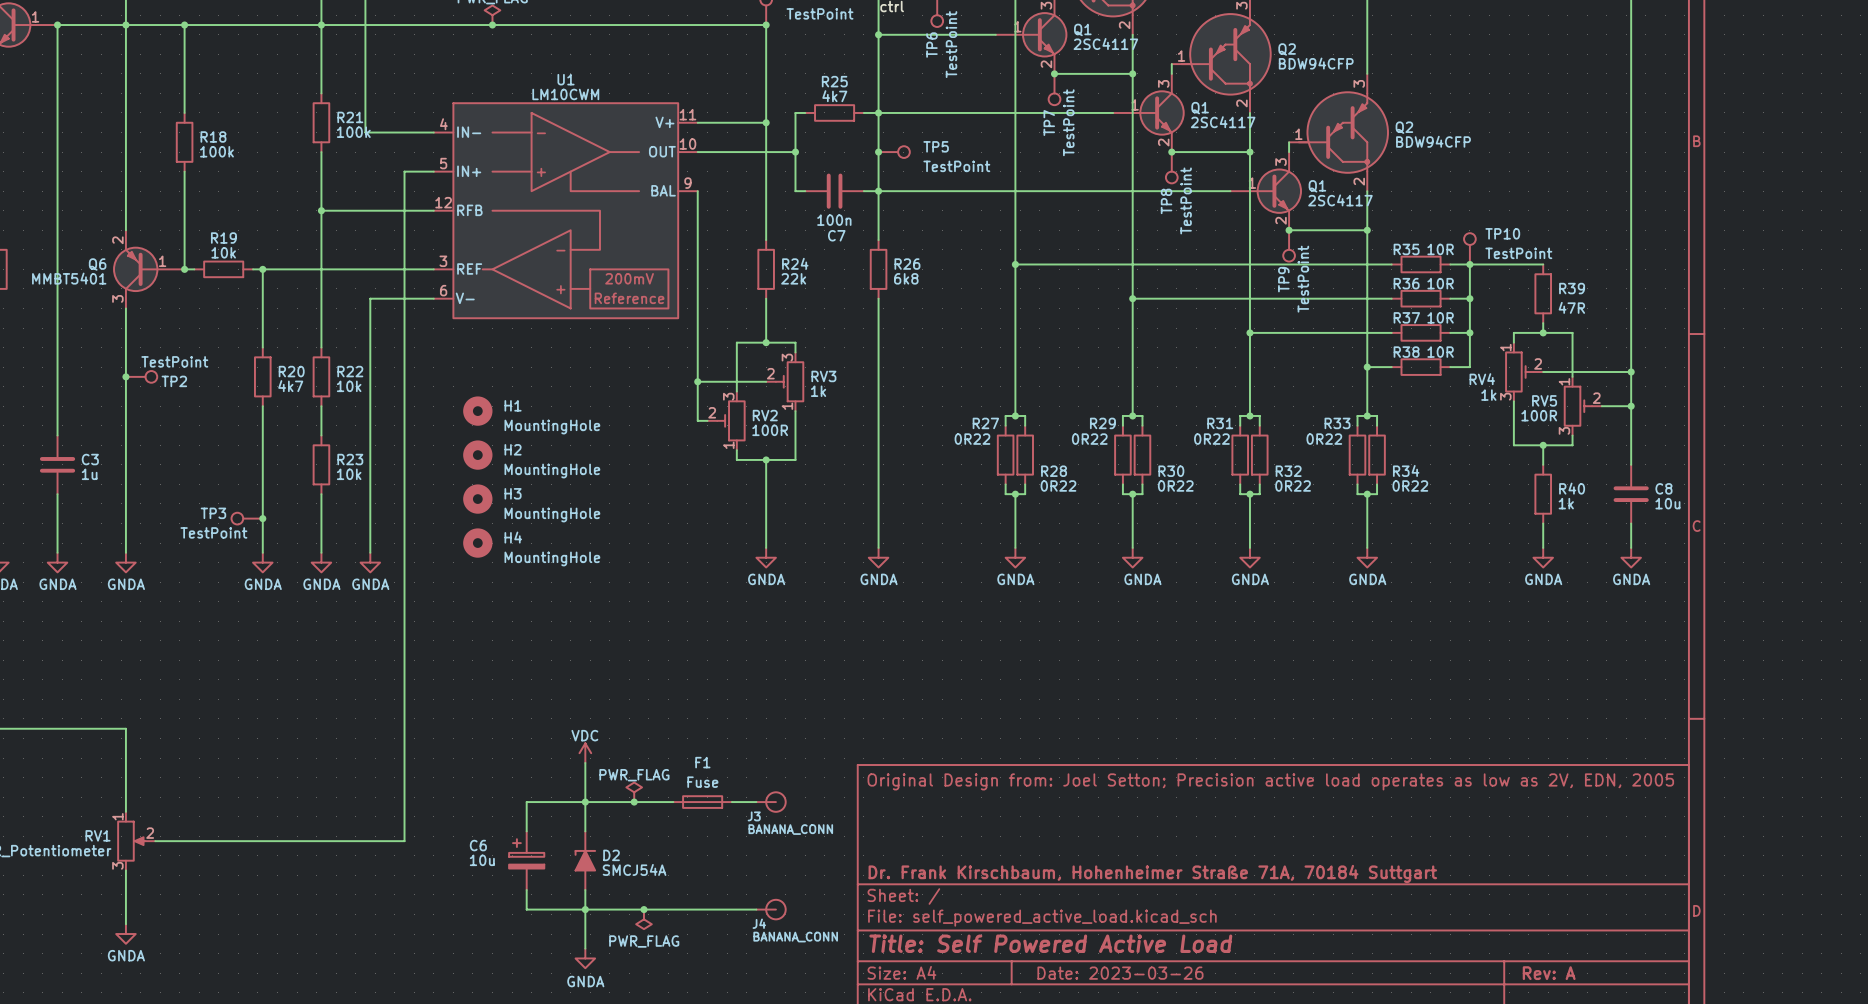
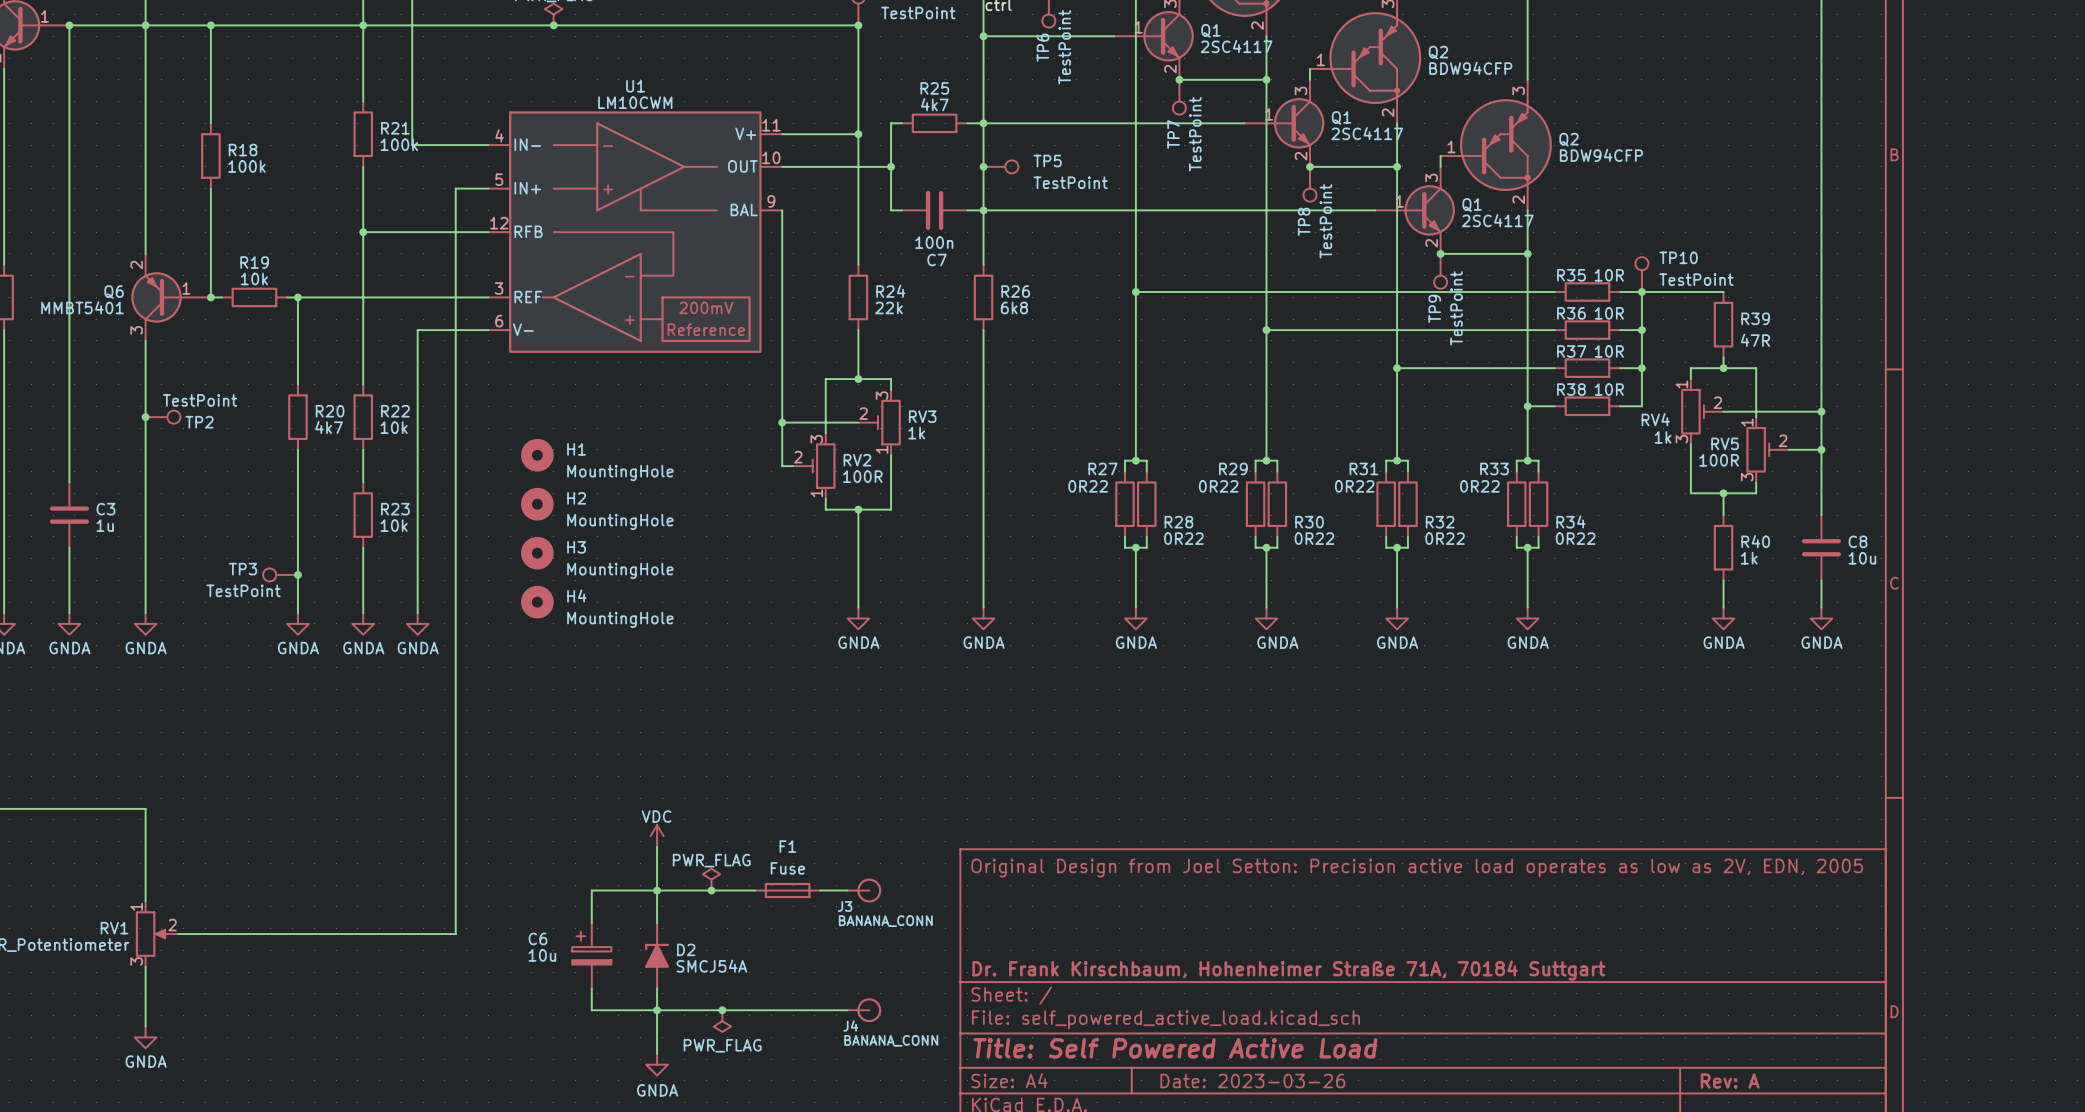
title block: Original Design from: Joel Setton; Precision active load operates as low as 2V, EDN, 2005 (1270, 781) -> Original Design from Joel Setton: Precision active load operates as low as 2V, EDN, 2005 (1417, 868)

